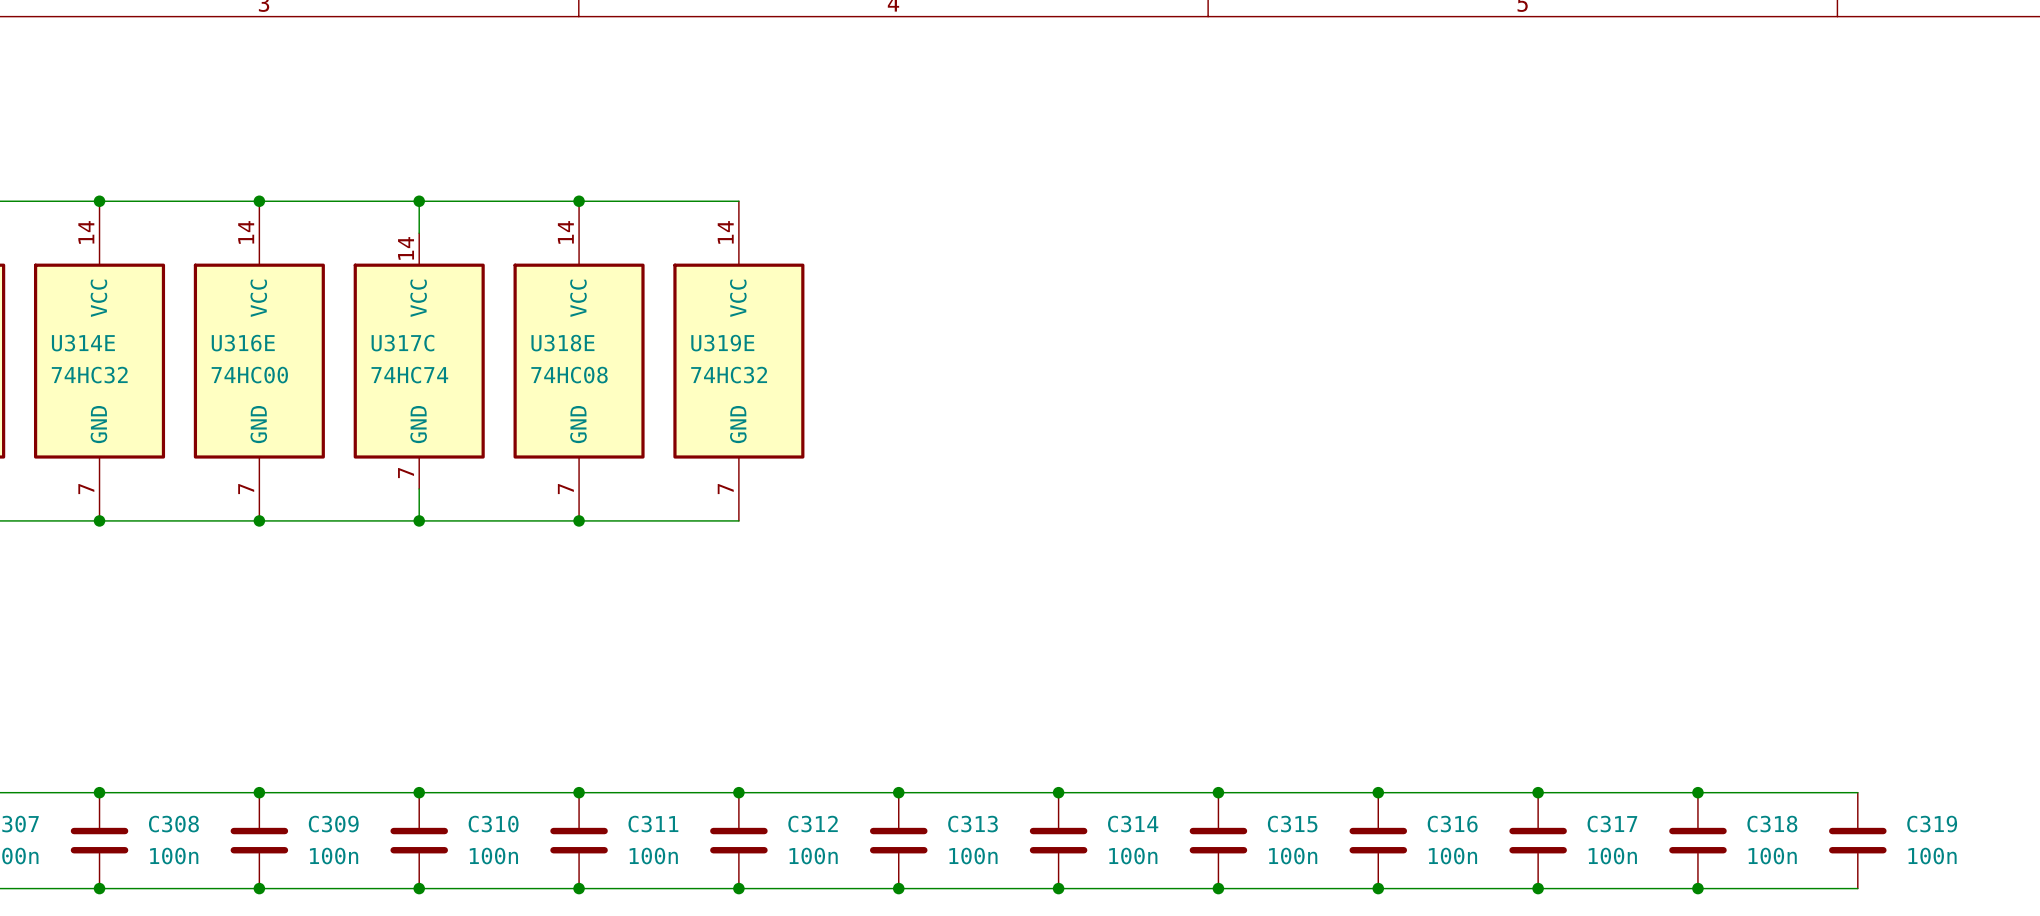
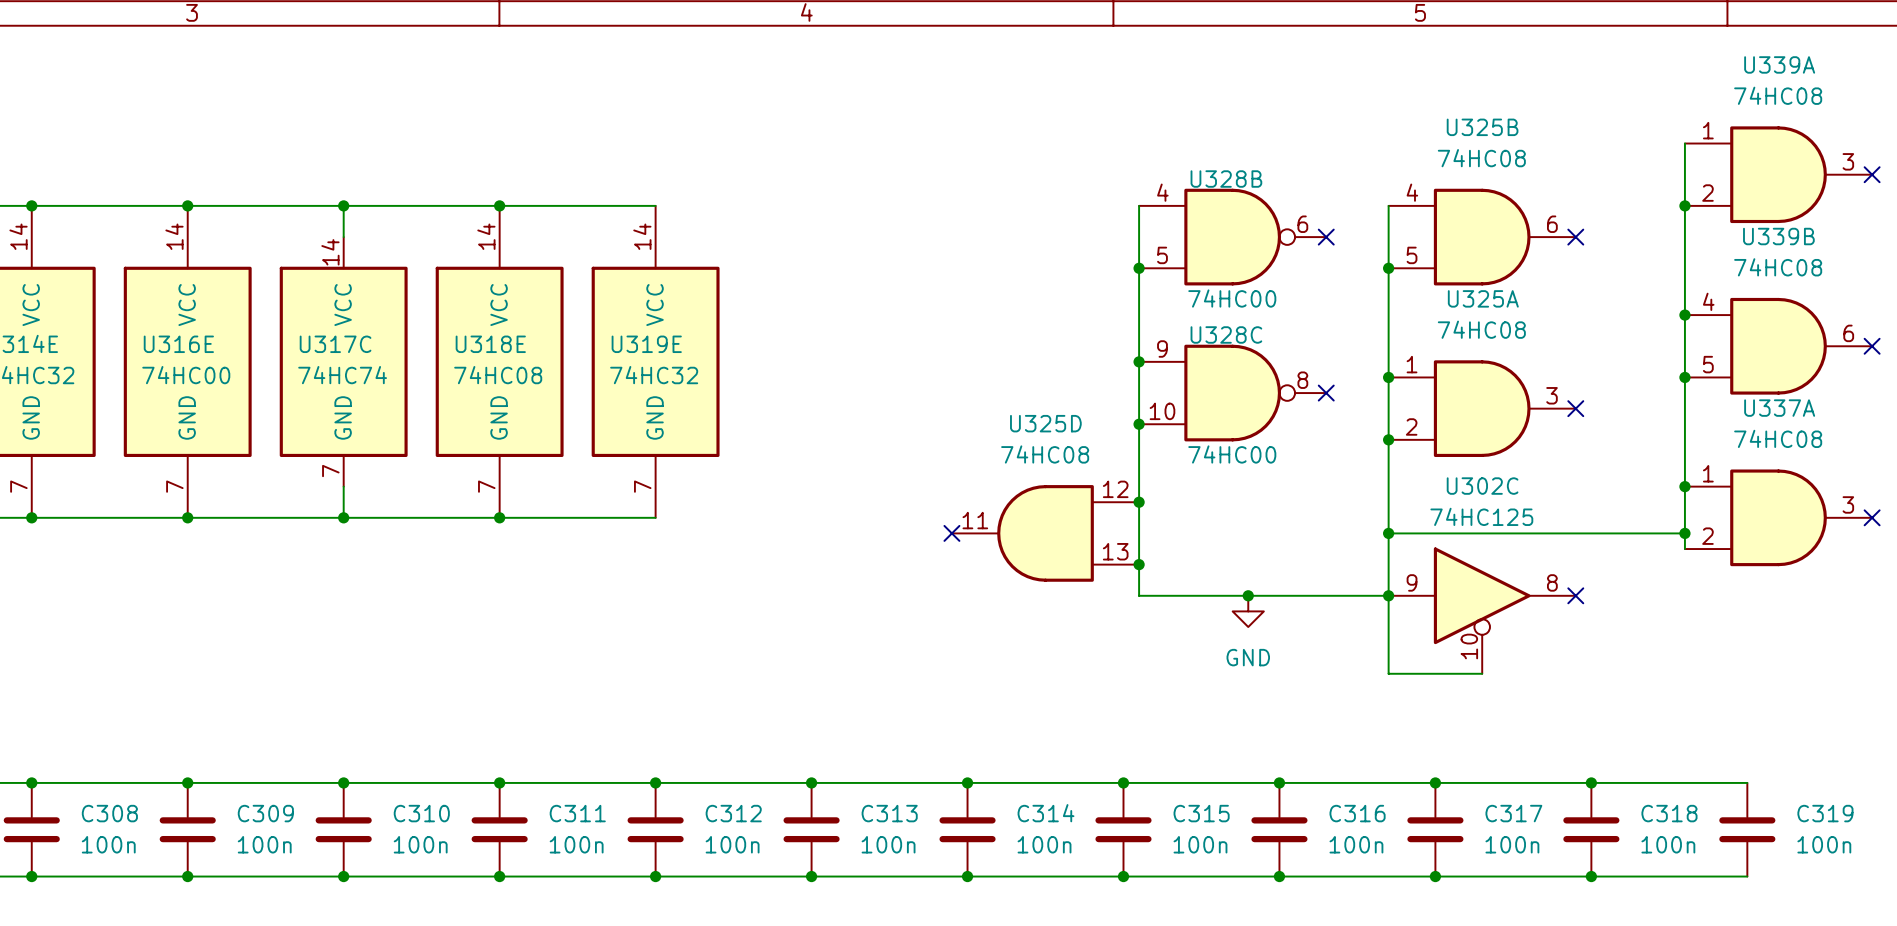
wire: none -> (1684, 143) (1684, 549)
U339A: none -> 74HC08 (1778, 174)
no-connect mark: none -> (1872, 174)
wire: none -> (1139, 205) (1139, 595) (1388, 595)
wire: none -> (1388, 205) (1388, 673) (1482, 673)
junction: none -> (1684, 205)
U328B: none -> 74HC00 (1232, 237)
no-connect mark: none -> (1326, 237)
U325B: none -> 74HC08 (1482, 237)
no-connect mark: none -> (1575, 237)
junction: none -> (1139, 268)
junction: none -> (1388, 268)
junction: none -> (1684, 315)
U339B: none -> 74HC08 (1778, 346)
no-connect mark: none -> (1872, 346)
junction: none -> (1139, 361)
junction: none -> (1388, 377)
junction: none -> (1684, 377)
U328C: none -> 74HC00 (1232, 393)
no-connect mark: none -> (1326, 393)
U325A: none -> 74HC08 (1482, 408)
no-connect mark: none -> (1575, 408)
junction: none -> (1139, 424)
junction: none -> (1388, 439)
junction: none -> (1684, 486)
junction: none -> (1139, 502)
U337A: none -> 74HC08 (1778, 517)
no-connect mark: none -> (1872, 517)
no-connect mark: none -> (951, 533)
U325D: none -> 74HC08 (1045, 533)
wire: none -> (1388, 533) (1684, 533)
junction: none -> (1388, 533)
junction: none -> (1684, 533)
junction: none -> (1139, 564)
junction: none -> (1248, 595)
junction: none -> (1388, 595)
no-connect mark: none -> (1575, 595)
power symbol: none -> GND (1248, 611)
U302C: none -> 74HC125 (1482, 610)

